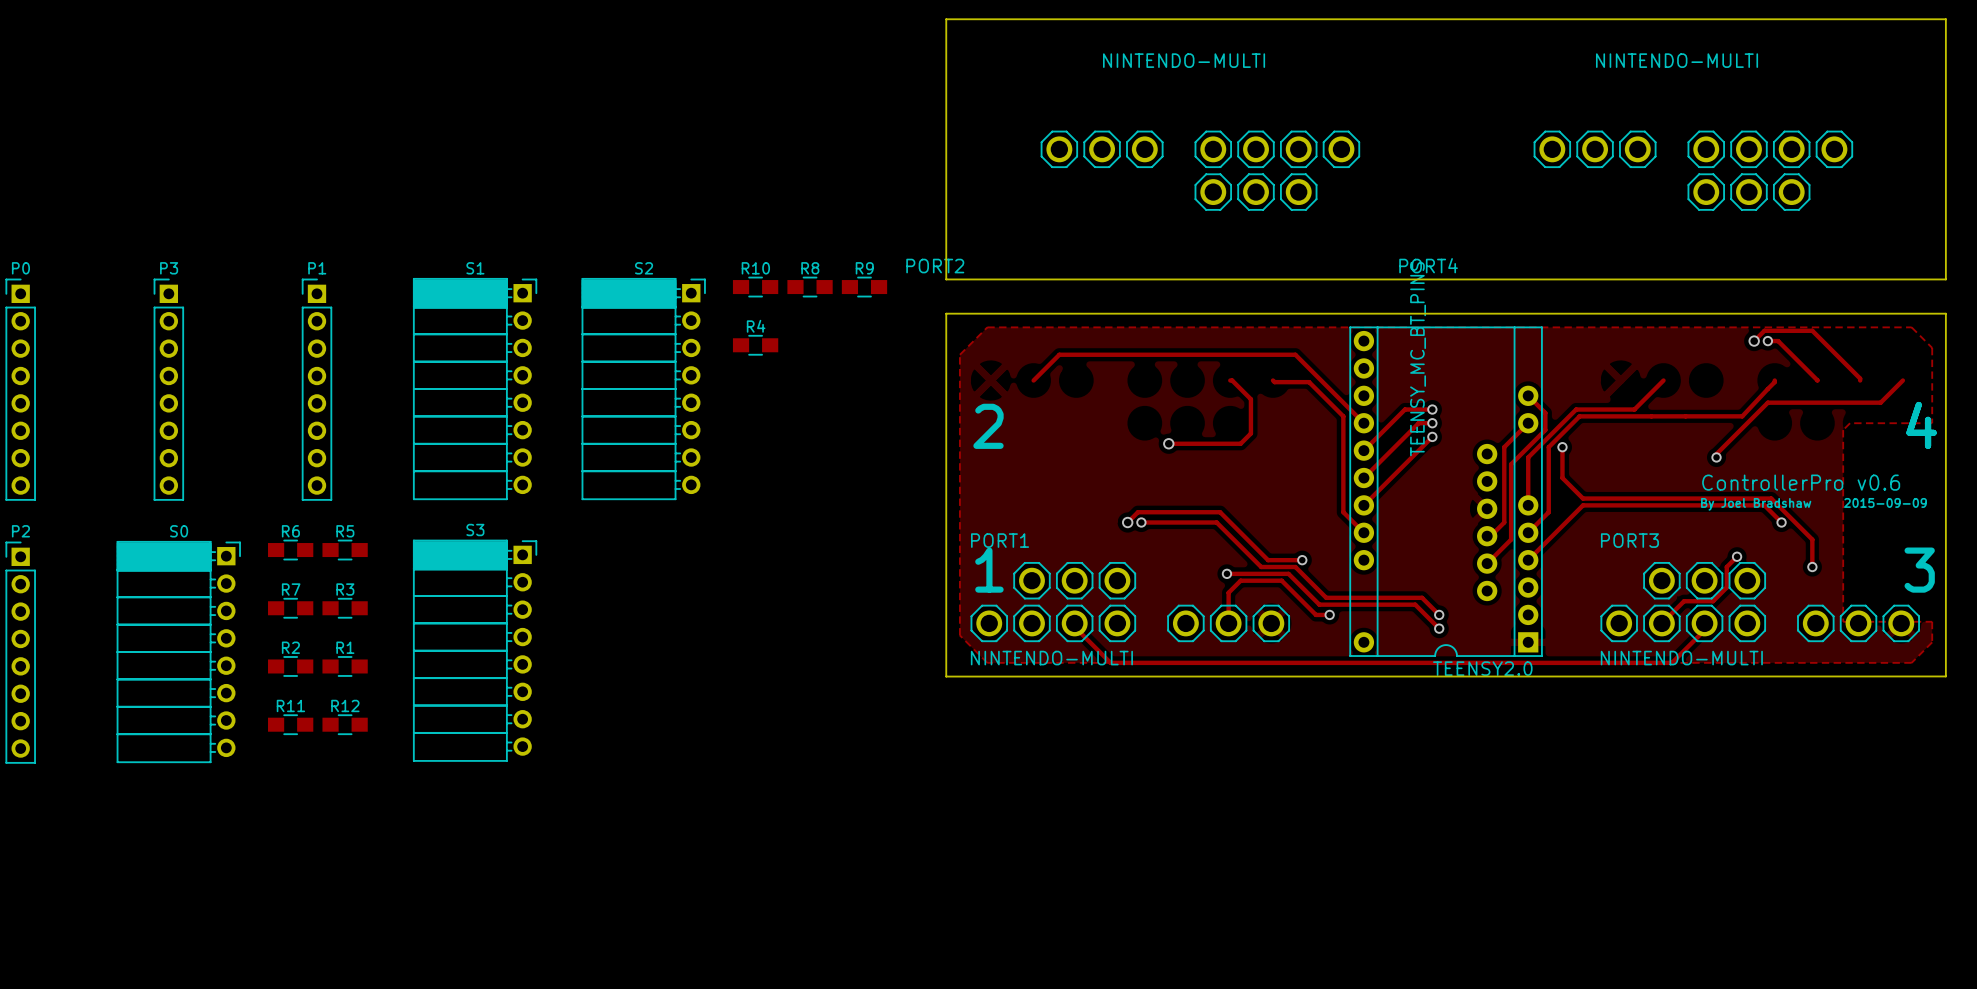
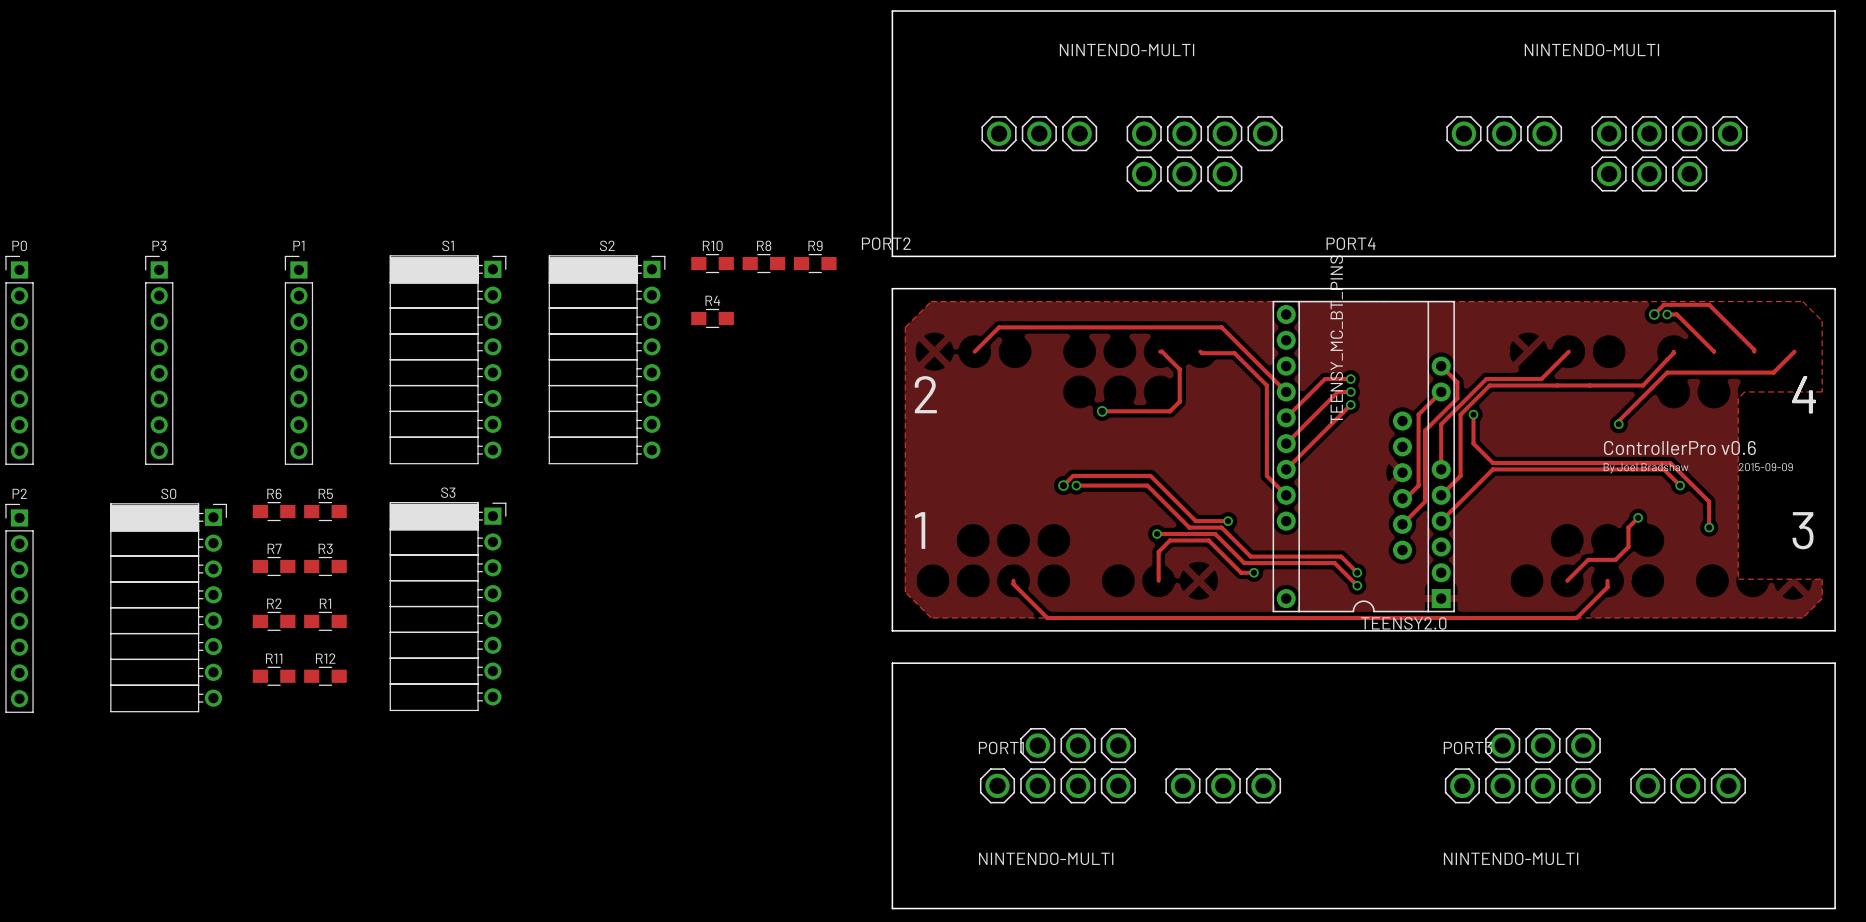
PORT1 name position: PORT1 (1000, 540) -> PORT1 (1001, 748)
PORT3 name position: PORT3 (1629, 540) -> PORT3 (1467, 748)
PORT1 position: (1130, 602) -> (1130, 765)
PORT3 position: (1760, 602) -> (1595, 765)
PORT1 value position: NINTENDO-MULTI (1051, 658) -> NINTENDO-MULTI (1046, 858)
PORT3 value position: NINTENDO-MULTI (1681, 658) -> NINTENDO-MULTI (1511, 858)
board edge: none -> (892, 663) (1835, 663) (1835, 908) (892, 908) (892, 663)

